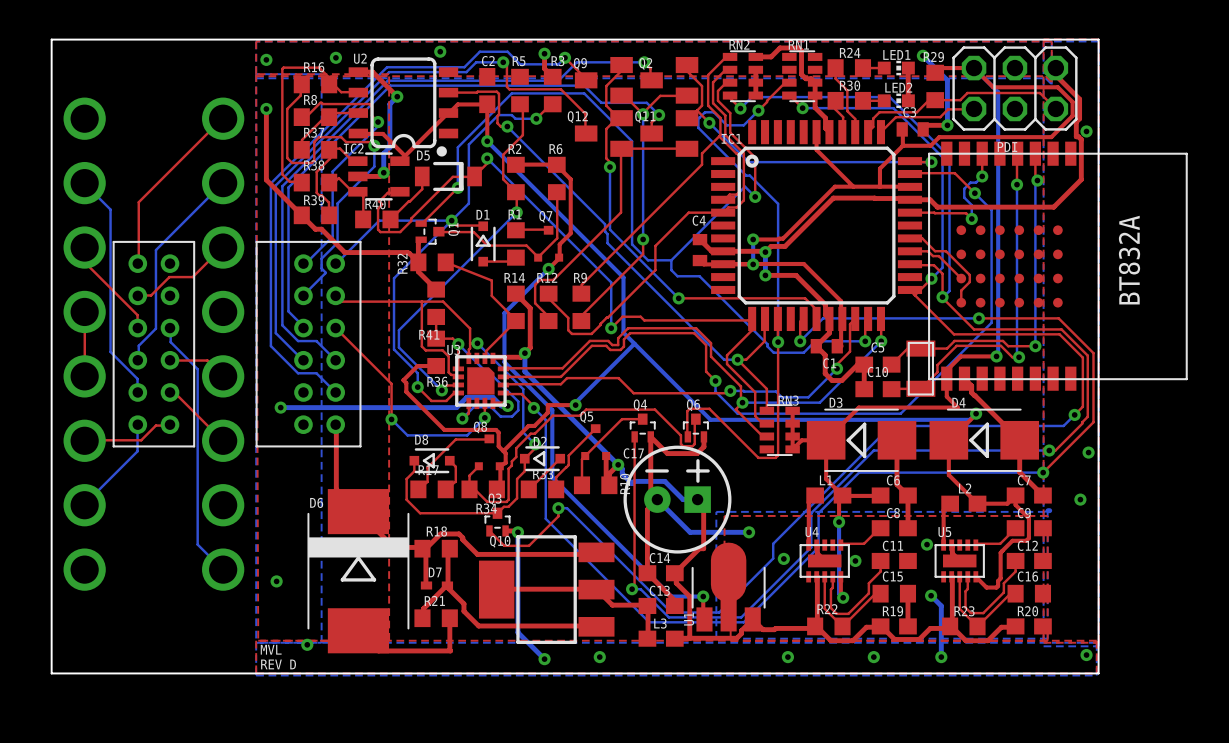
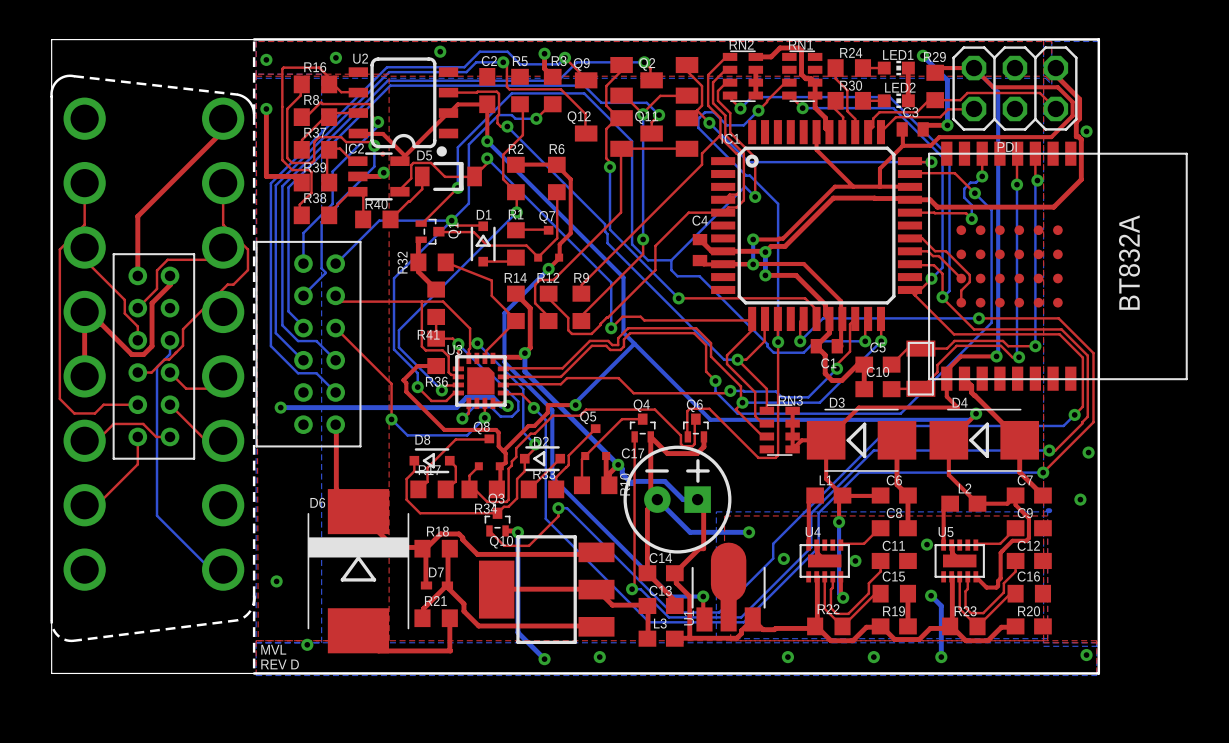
board edge: none -> (254, 39) (1098, 39) (1098, 673) (254, 673) (254, 41)
top track: (358, 72) (372, 72) (397, 96) -> none
bottom track: (397, 96) (389, 104) (389, 147) (383, 153) (383, 172) -> none
via: (397, 96) -> none
board edge: none -> (254, 115) (249, 101) (237, 94) (69, 75) (59, 79) (52, 87) (51, 622) (58, 635) (71, 640) (237, 620) (250, 610) (254, 595)
top track: (223, 118) (138, 202) (137, 263) -> none
top track: none -> (223, 130) (137, 216) (137, 275)
top track: (330, 151) (330, 158) (316, 171) (316, 192) (328, 202) (329, 215) -> (330, 151) (327, 154) (327, 182)
top track: none -> (382, 153) (382, 154)
top track: (282, 160) (282, 174) (289, 181) (301, 182) -> (282, 160) (292, 170) (309, 170) (311, 172) (311, 192) (299, 204) (299, 215)
R38 name: R38 (314, 165) -> R39 (315, 167)
top track: (266, 176) (266, 179) (315, 229) (321, 229) (344, 252) (407, 252) (418, 262) -> (266, 176) (293, 176) (299, 182)
top track: (452, 176) (400, 232) (380, 232) (378, 229) (378, 208) (381, 205) (379, 201) (387, 192) (399, 191) -> (452, 176) (445, 176) (431, 162) (413, 162) (411, 165) (411, 178) (397, 191)
top track: (329, 182) (335, 181) (338, 178) (352, 191) (358, 191) -> (327, 215) (350, 191) (358, 191)
bottom track: (84, 183) (110, 209) (110, 351) (137, 378) (137, 392) -> none
bottom track: (223, 183) (155, 250) (155, 328) (138, 345) (137, 360) -> none
top track: none -> (84, 195) (84, 224) (59, 249) (59, 398) (74, 413) (94, 413) (103, 404) (137, 404)
top track: none -> (223, 195) (223, 224) (247, 249) (247, 270) (233, 284) (227, 284) (183, 329) (183, 345) (169, 359) (164, 359) (151, 372) (137, 372)
R39 name: R39 (314, 200) -> R38 (315, 198)
bottom track: (332, 203) (332, 236) (304, 264) (303, 263) -> (332, 203) (303, 233) (303, 263)
bottom track: (337, 205) (337, 242) (321, 258) -> (337, 205) (321, 221) (321, 258)
top track: (84, 247) (84, 262) (137, 315) (137, 328) -> none
top track: (223, 247) (192, 277) (169, 277) (151, 295) (137, 295) -> none
top track: none -> (84, 259) (124, 299) (124, 313) (137, 326) (137, 340)
top track: none -> (223, 259) (167, 259) (157, 270) (157, 288) (137, 308)
top track: none -> (170, 275) (170, 284) (152, 303) (152, 346) (143, 354) (131, 354) (101, 324) (84, 324) (84, 388)
bottom track: (170, 328) (170, 342) (197, 369) (197, 544) (223, 569) -> none
bottom track: none -> (170, 340) (170, 354) (157, 367) (157, 515) (223, 581)
part position: (153, 344) -> (153, 356)
top track: (170, 360) (207, 360) (223, 376) -> none
top track: none -> (170, 372) (186, 388) (223, 388)
top track: (170, 392) (175, 393) (223, 440) -> none
top track: none -> (170, 404) (218, 453) (223, 453)
bottom track: (137, 424) (137, 451) (84, 505) -> none
top track: (170, 424) (155, 425) (141, 440) (84, 440) -> none
top track: none -> (137, 436) (137, 464) (84, 517)
top track: none -> (170, 436) (156, 436) (143, 423) (113, 423) (84, 453)

